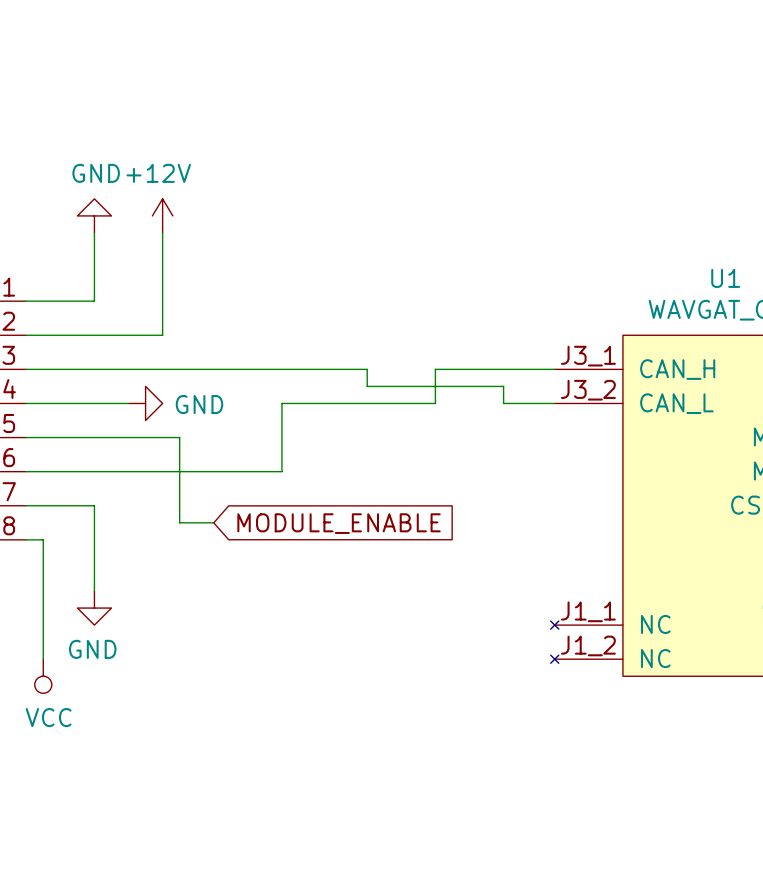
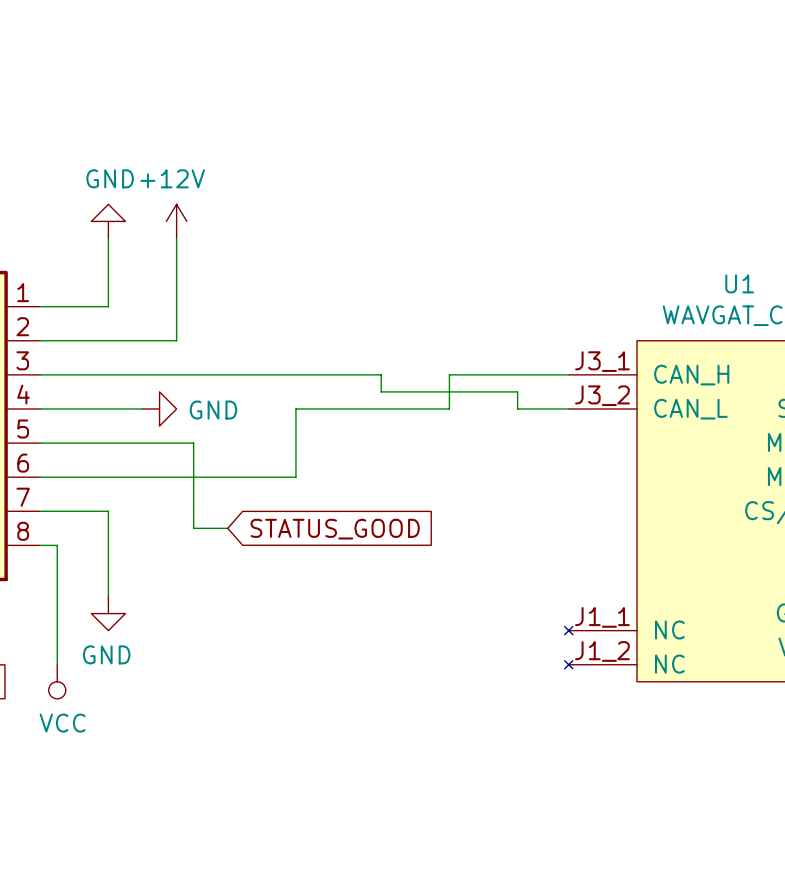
global label: MODULE_ENABLE (339, 523) -> STATUS_GOOD (335, 529)

